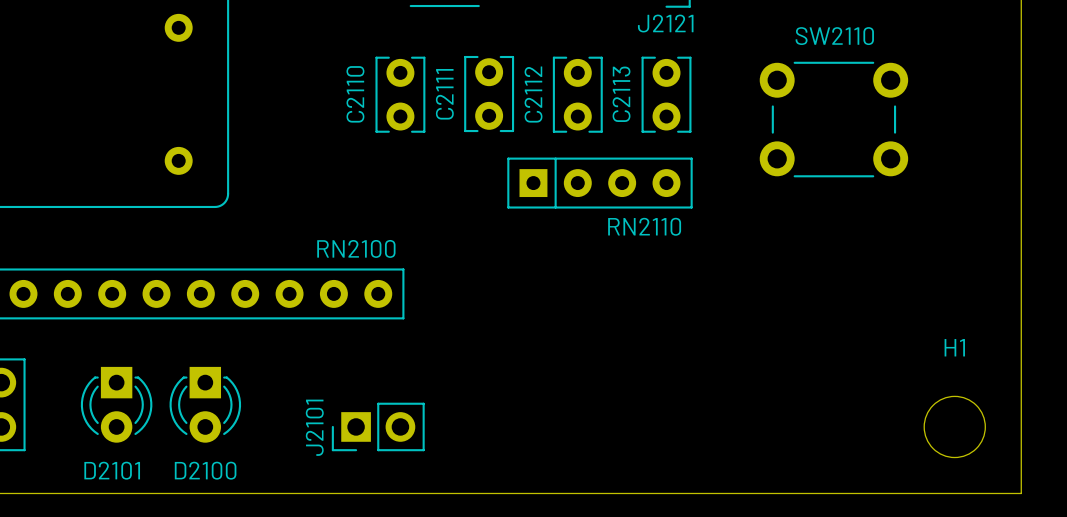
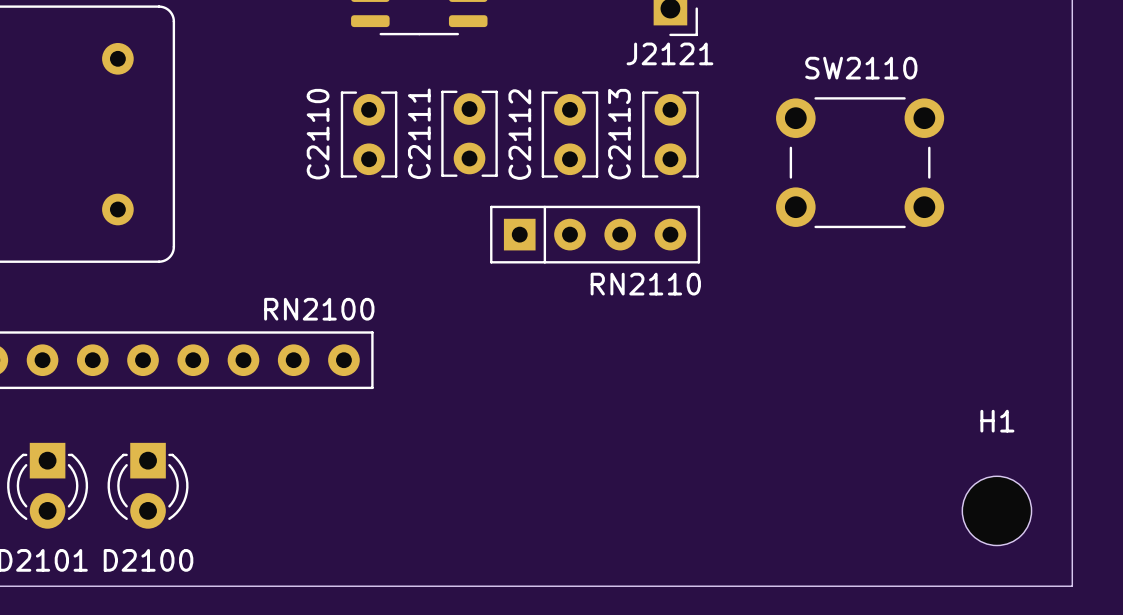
J2101: (378, 426) -> none

